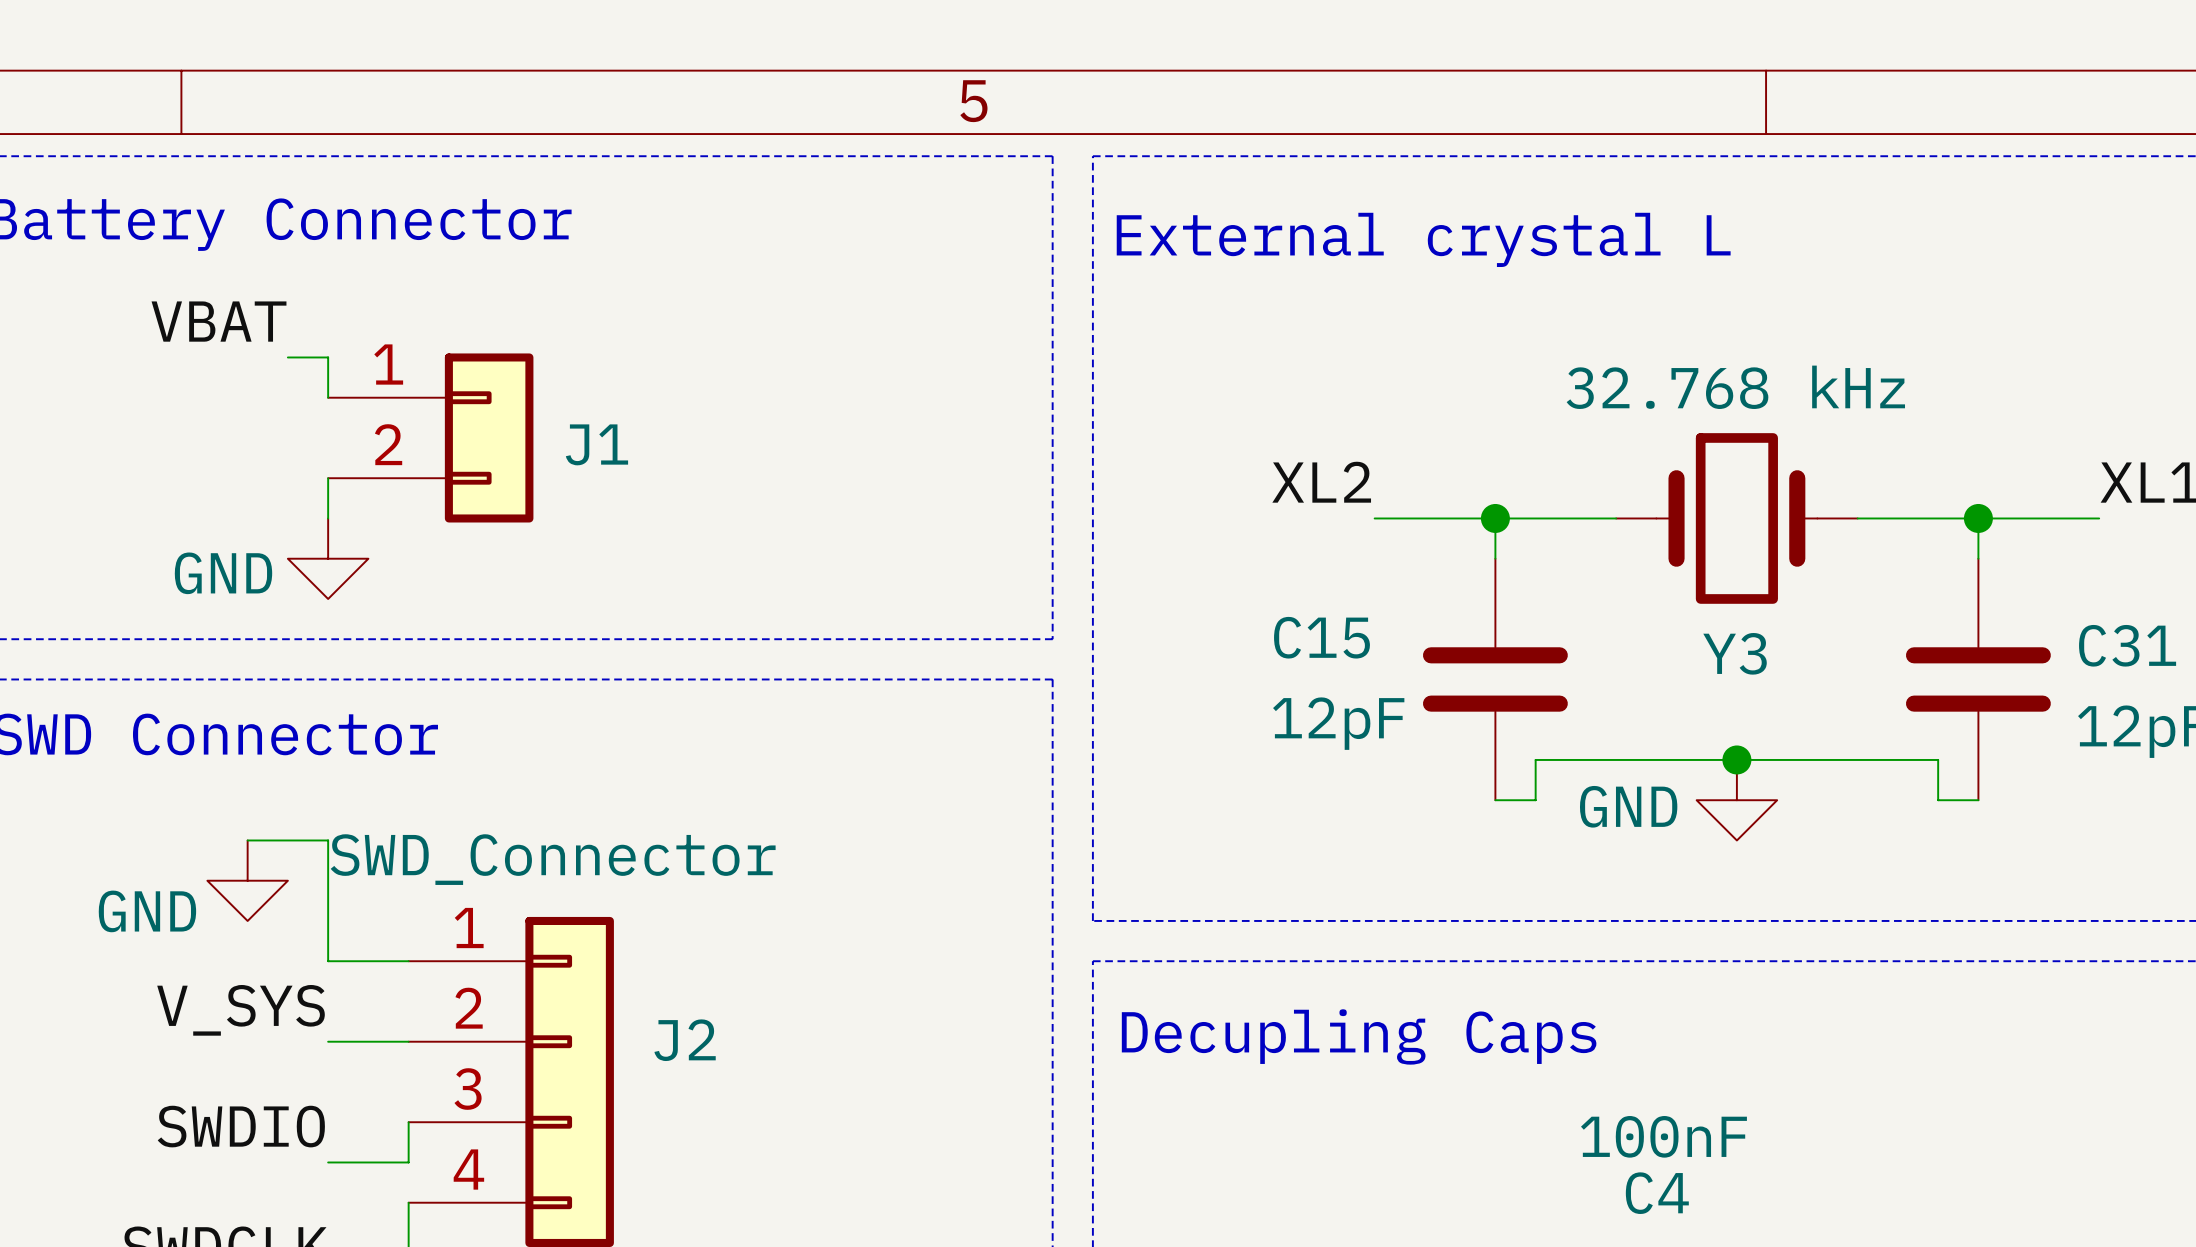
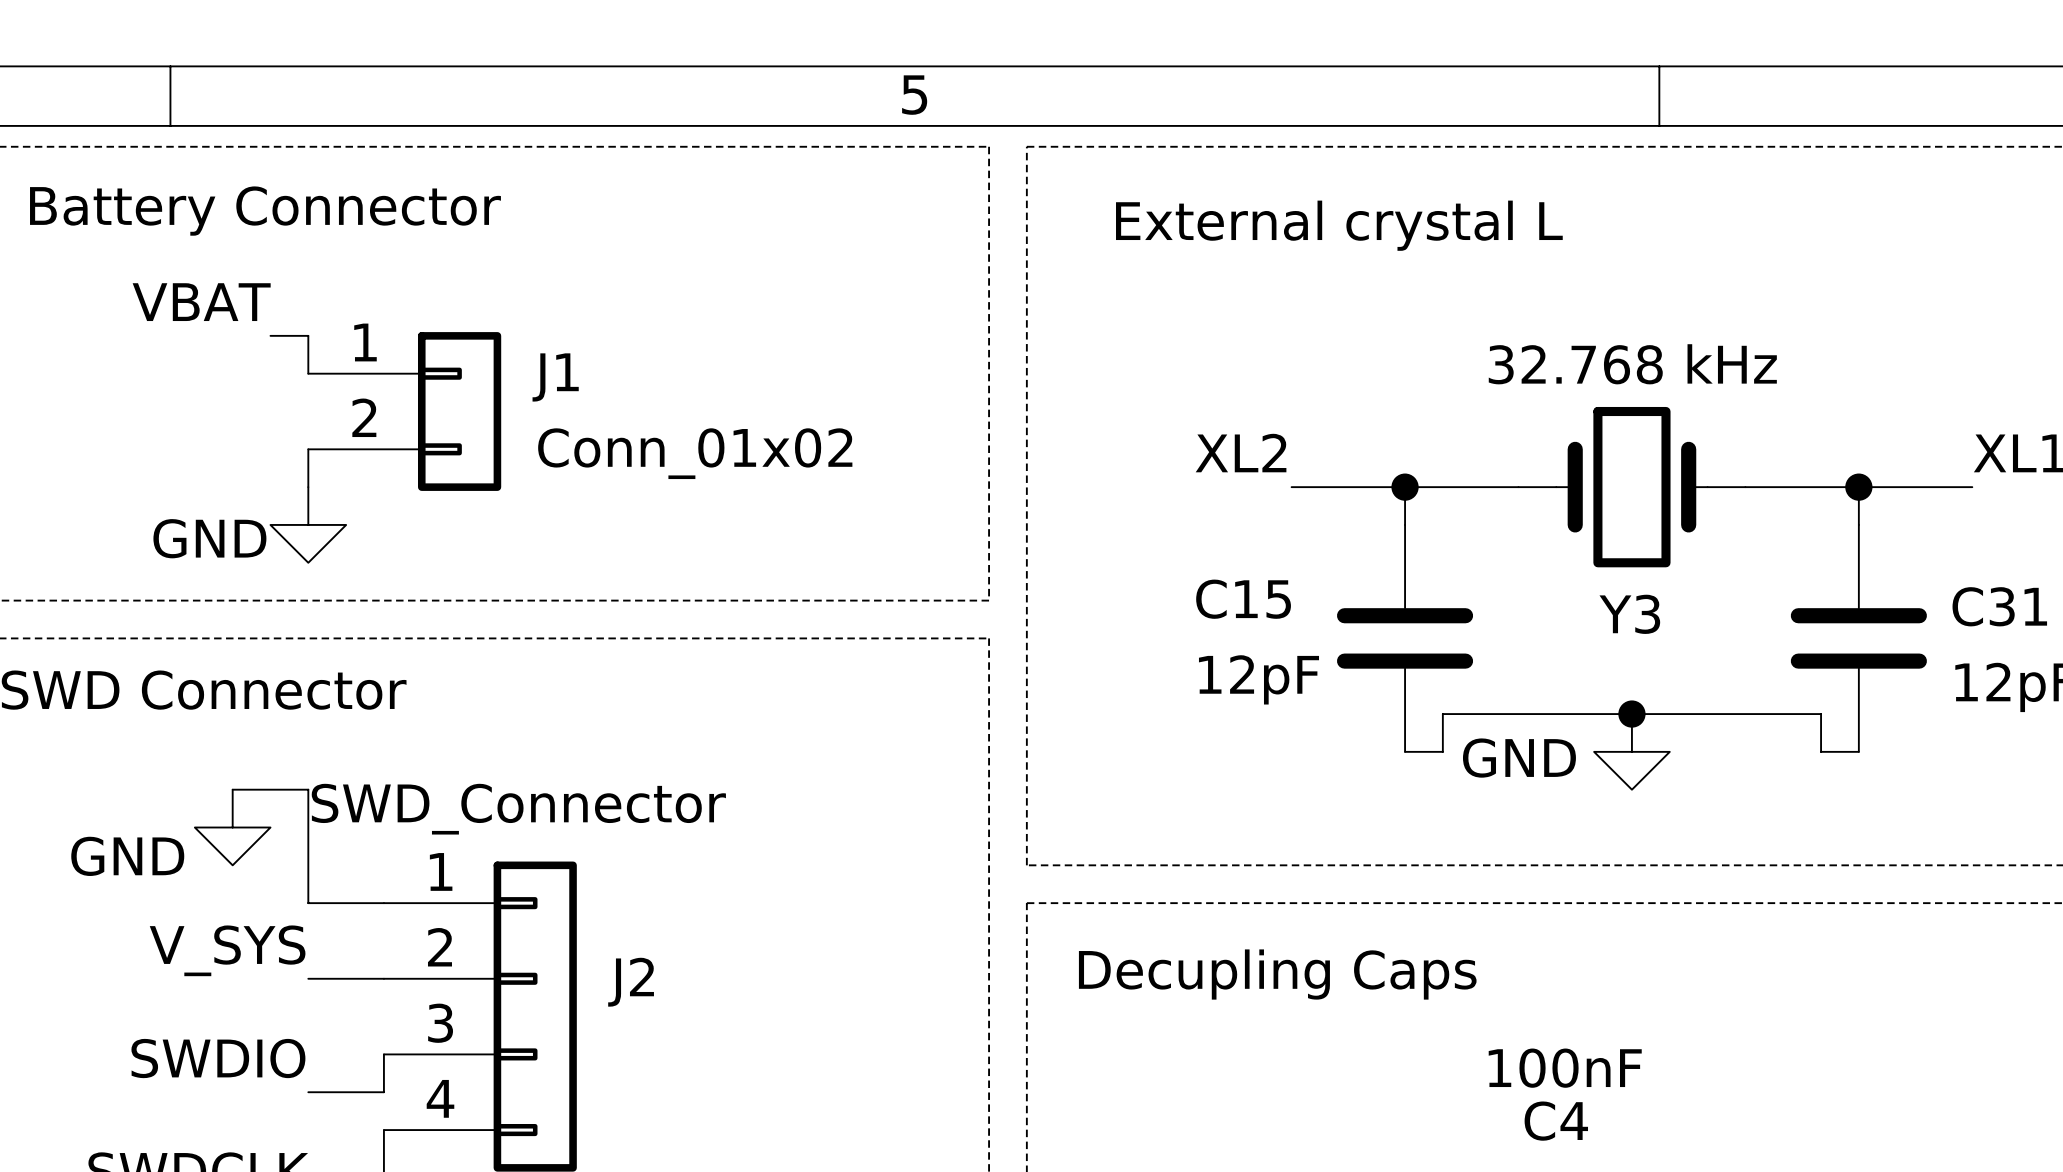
J1 name position: J1 (596, 444) -> J1 (555, 377)
J1 value: none -> Conn_01x02 (695, 453)

